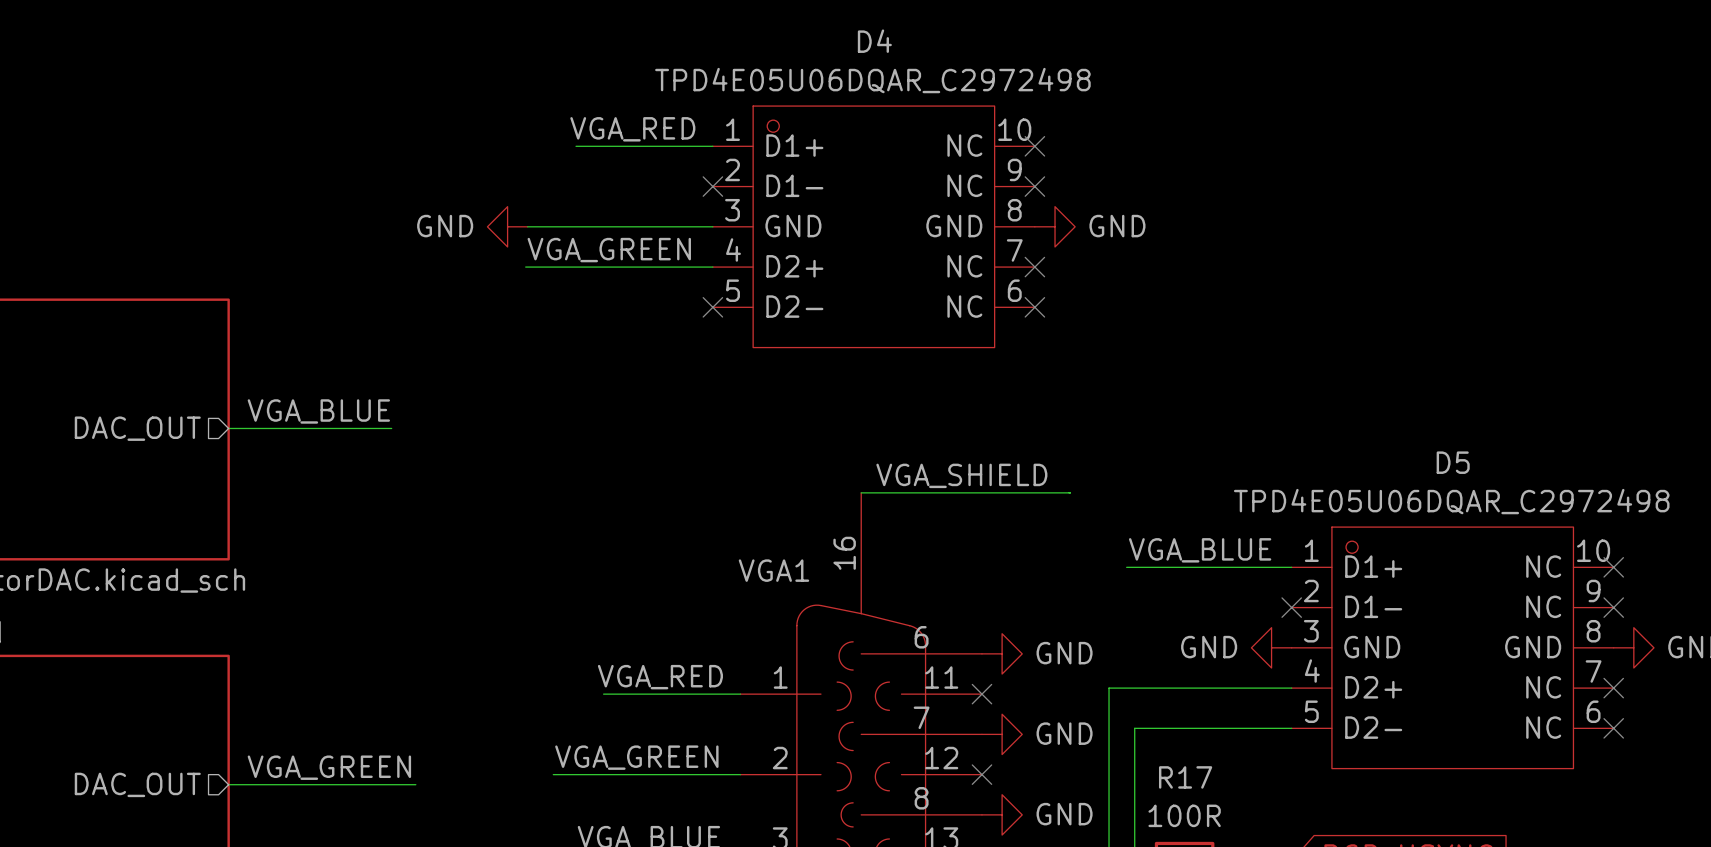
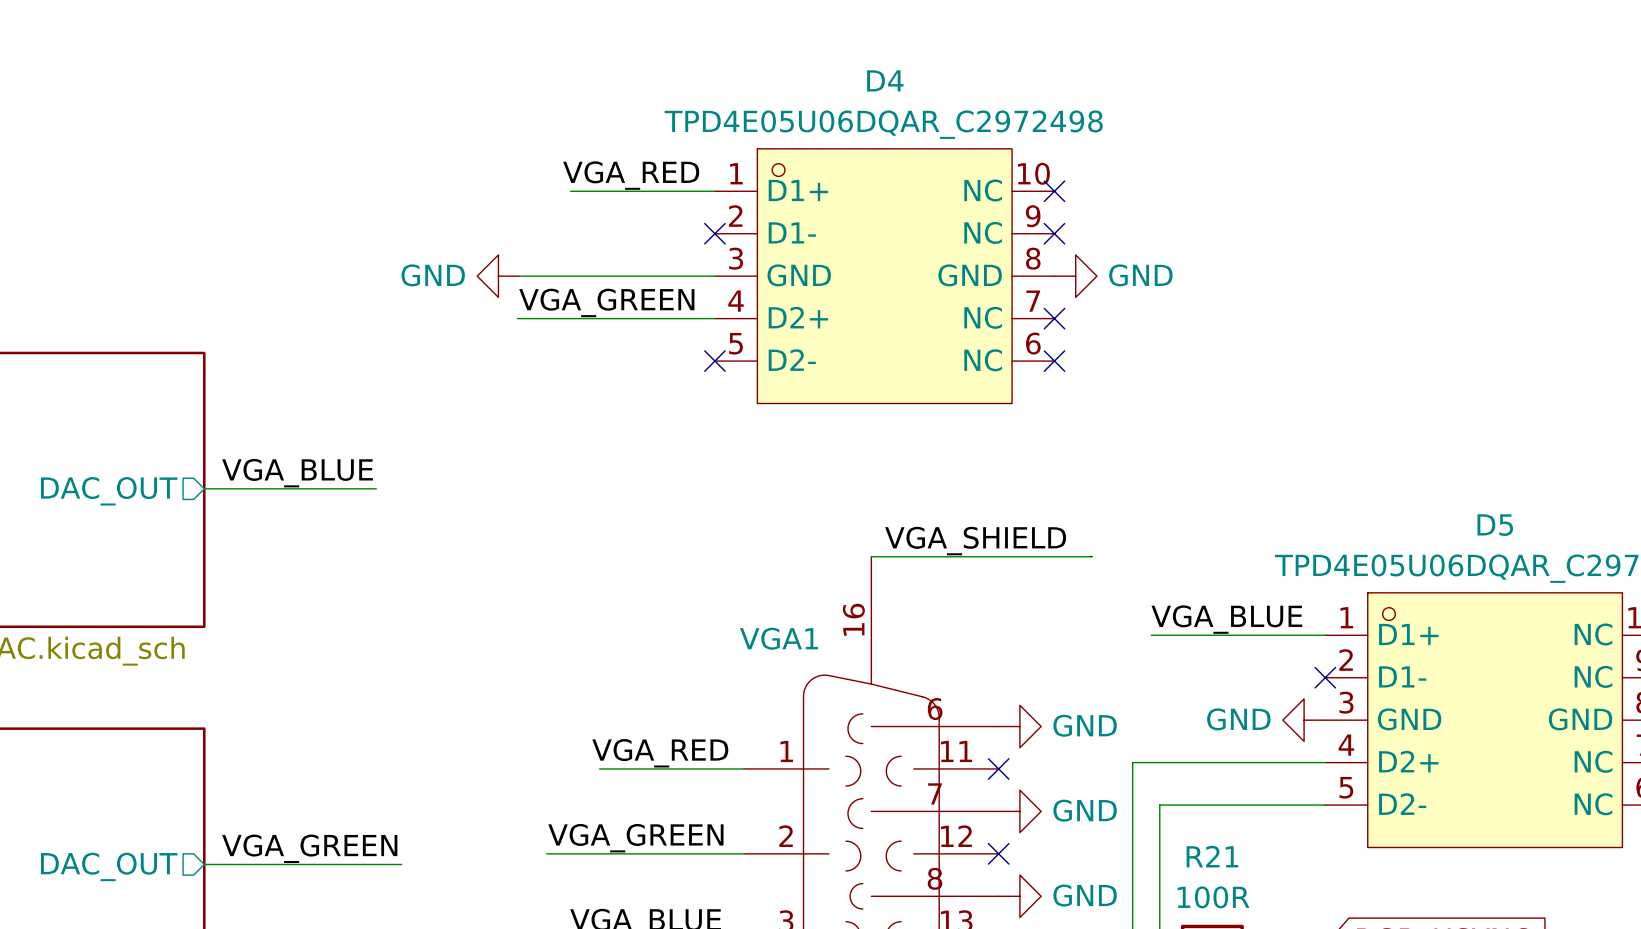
R17 name: R17 (1185, 777) -> R21 (1212, 856)

